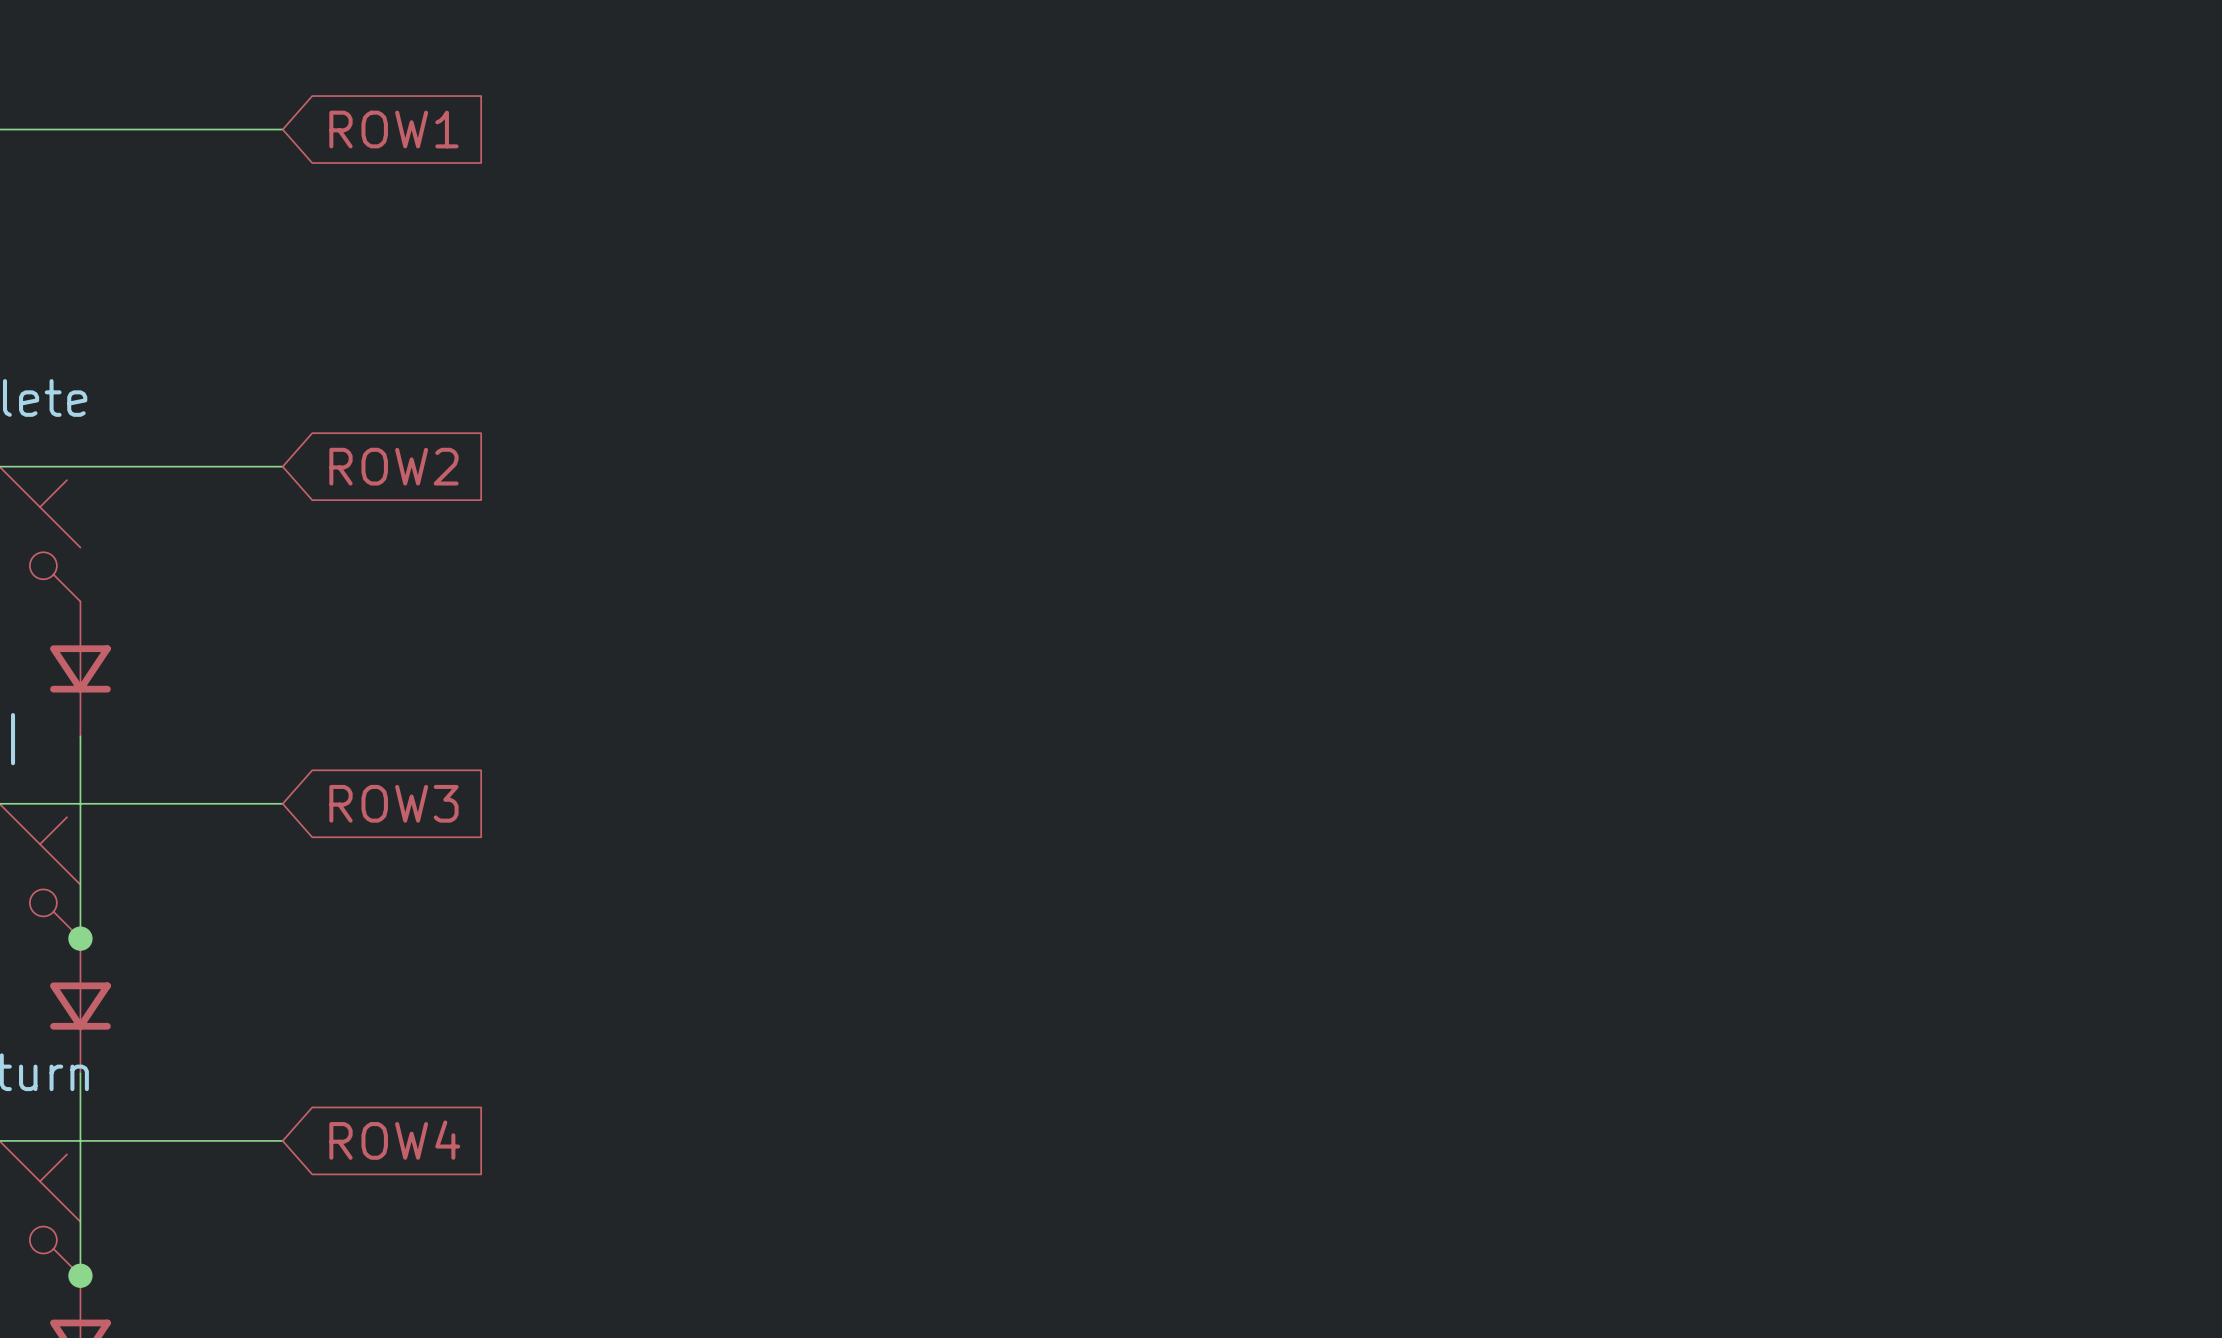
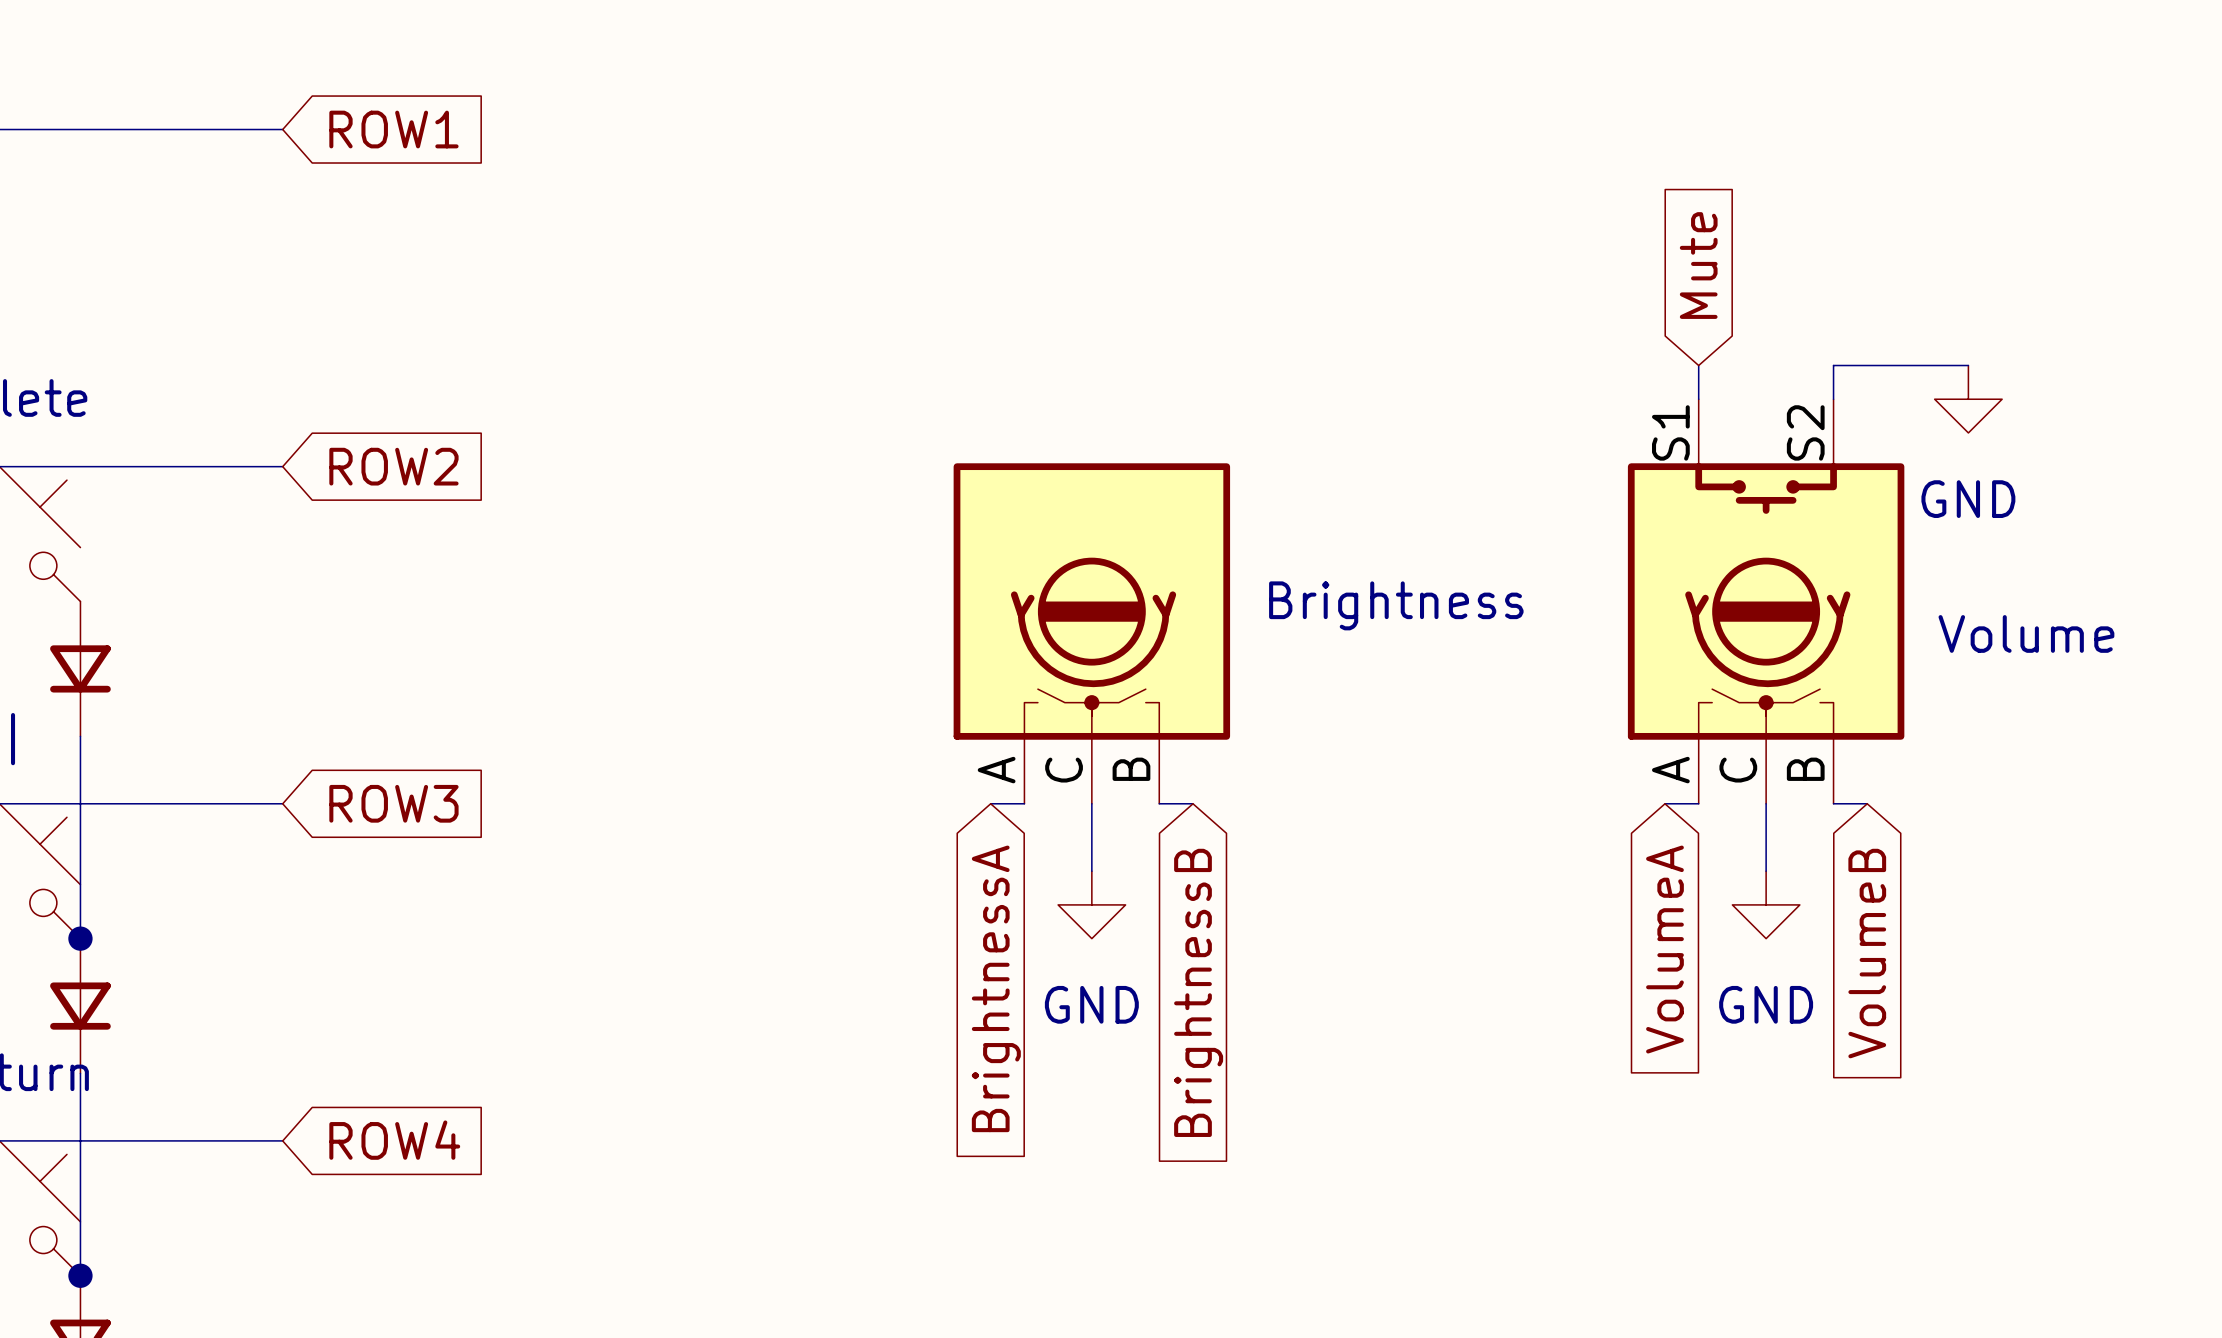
global label: none -> Mute (1698, 265)
wire: none -> (1698, 365) (1698, 399)
wire: none -> (1968, 365) (1833, 365) (1833, 399)
power symbol: none -> GND (1968, 399)
part: none -> Volume (1766, 601)
part: none -> Brightness (1091, 633)
wire: none -> (990, 803) (1024, 803)
wire: none -> (1091, 803) (1091, 871)
wire: none -> (1159, 803) (1192, 803)
wire: none -> (1664, 803) (1698, 803)
wire: none -> (1766, 803) (1766, 871)
wire: none -> (1833, 803) (1867, 803)
power symbol: none -> GND (1091, 904)
power symbol: none -> GND (1766, 904)
global label: none -> VolumeA (1664, 949)
global label: none -> VolumeB (1867, 953)
global label: none -> BrightnessA (996, 988)
global label: none -> BrightnessB (1198, 992)

